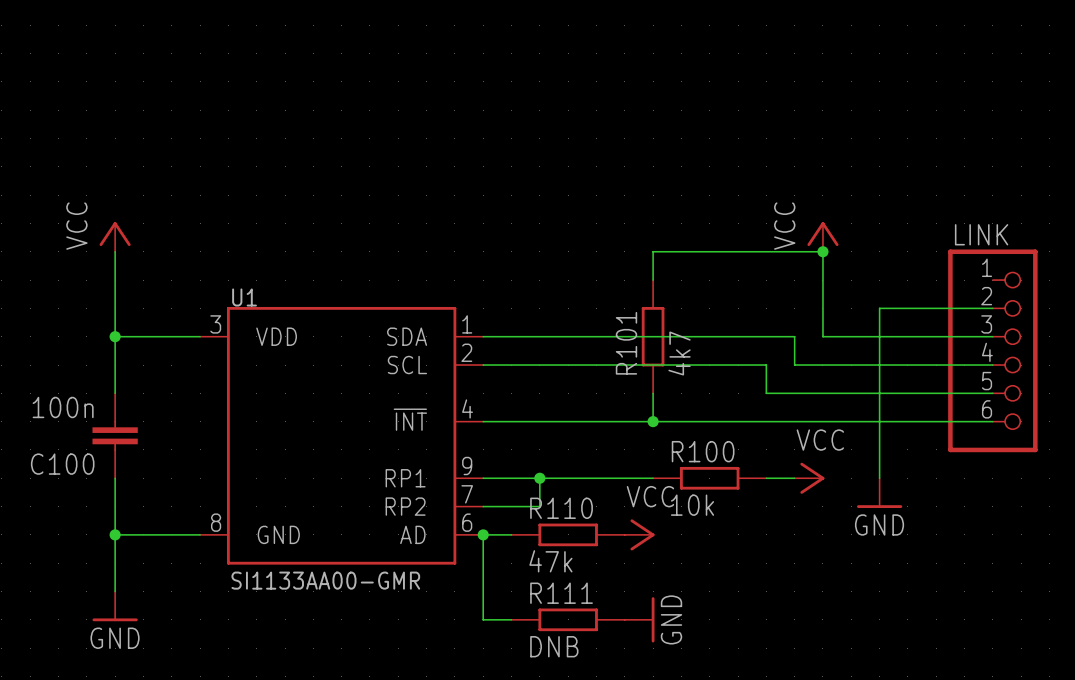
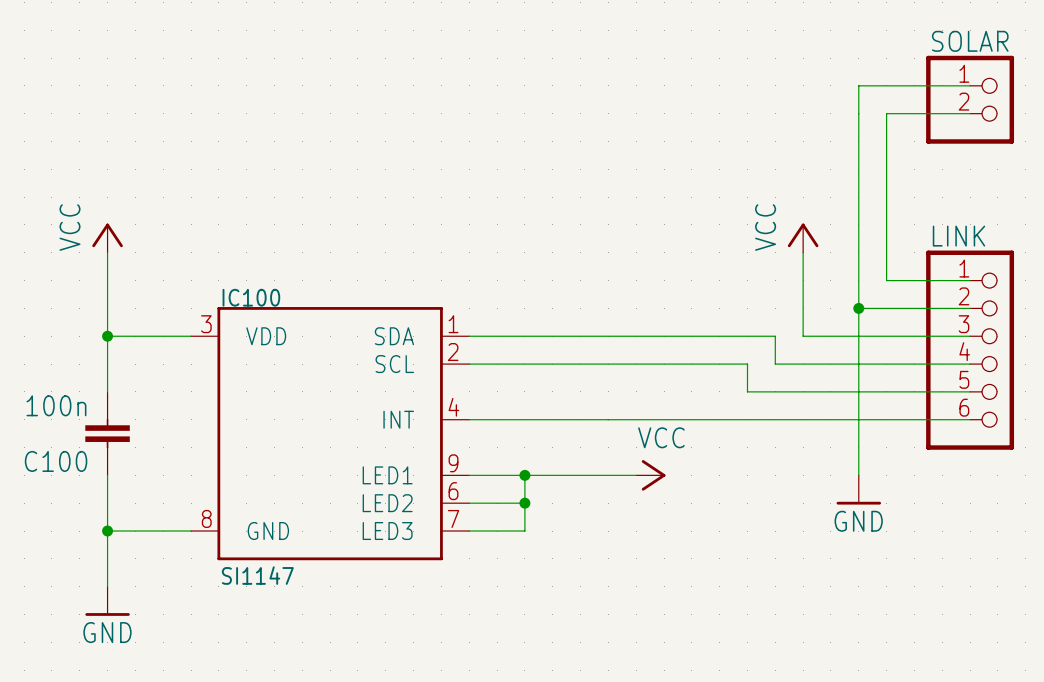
wire: none -> (970, 85) (858, 85) (858, 308)
SOLAR: none -> (970, 99)
wire: none -> (970, 113) (886, 113) (886, 280) (970, 280)
wire: (822, 251) (653, 251) (653, 280) -> none
junction: (822, 251) -> none
U1 name: U1 (244, 297) -> IC100 (251, 297)
junction: none -> (858, 308)
R101: 4k7 (653, 336) -> none
wire: (653, 393) (653, 421) -> none
U1 pin name: ~{INT} (410, 419) -> INT (398, 419)
junction: (653, 421) -> none
U1 pin name: RP1 (405, 478) -> LED1 (387, 475)
R100: 10k (709, 478) -> none
wire: (766, 478) (794, 478) -> none
power symbol: VCC (809, 478) -> none
U1 pin number: 7 (467, 494) -> 6 (453, 491)
U1 pin name: RP2 (405, 506) -> LED2 (387, 503)
U1 pin number: 6 (467, 522) -> 7 (453, 518)
U1 pin name: AD (412, 534) -> LED3 (387, 531)
wire: (483, 534) (483, 619) (511, 619) -> none
junction position: (483, 534) -> (524, 503)
R110: 47k (568, 534) -> none
power symbol position: VCC (639, 534) -> VCC (650, 475)
U1 value: SI1133AA00-GMR (325, 580) -> SI1147 (257, 575)
R111: DNB (568, 619) -> none
power symbol: GND (639, 619) -> none

